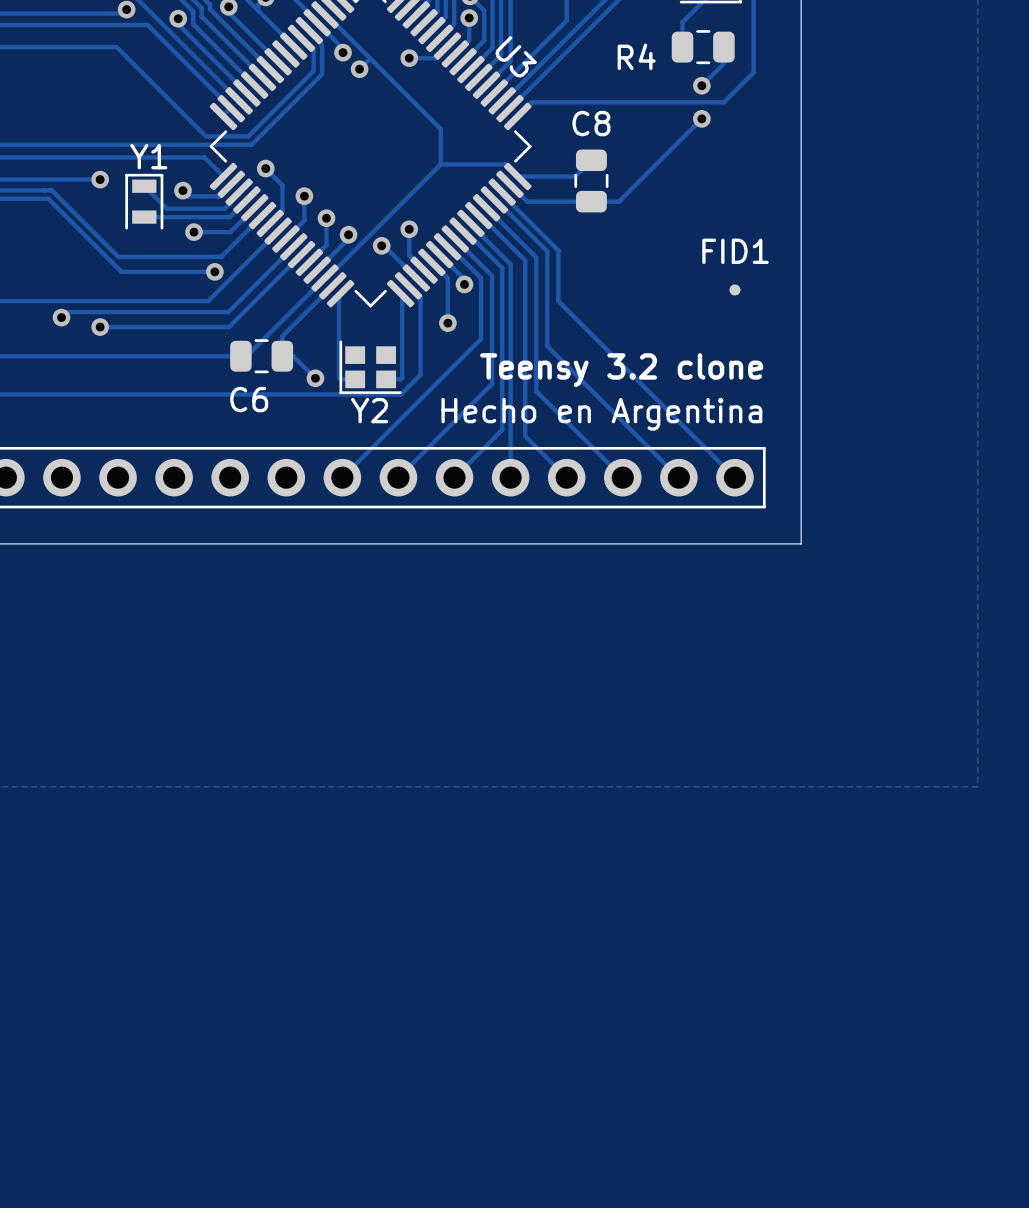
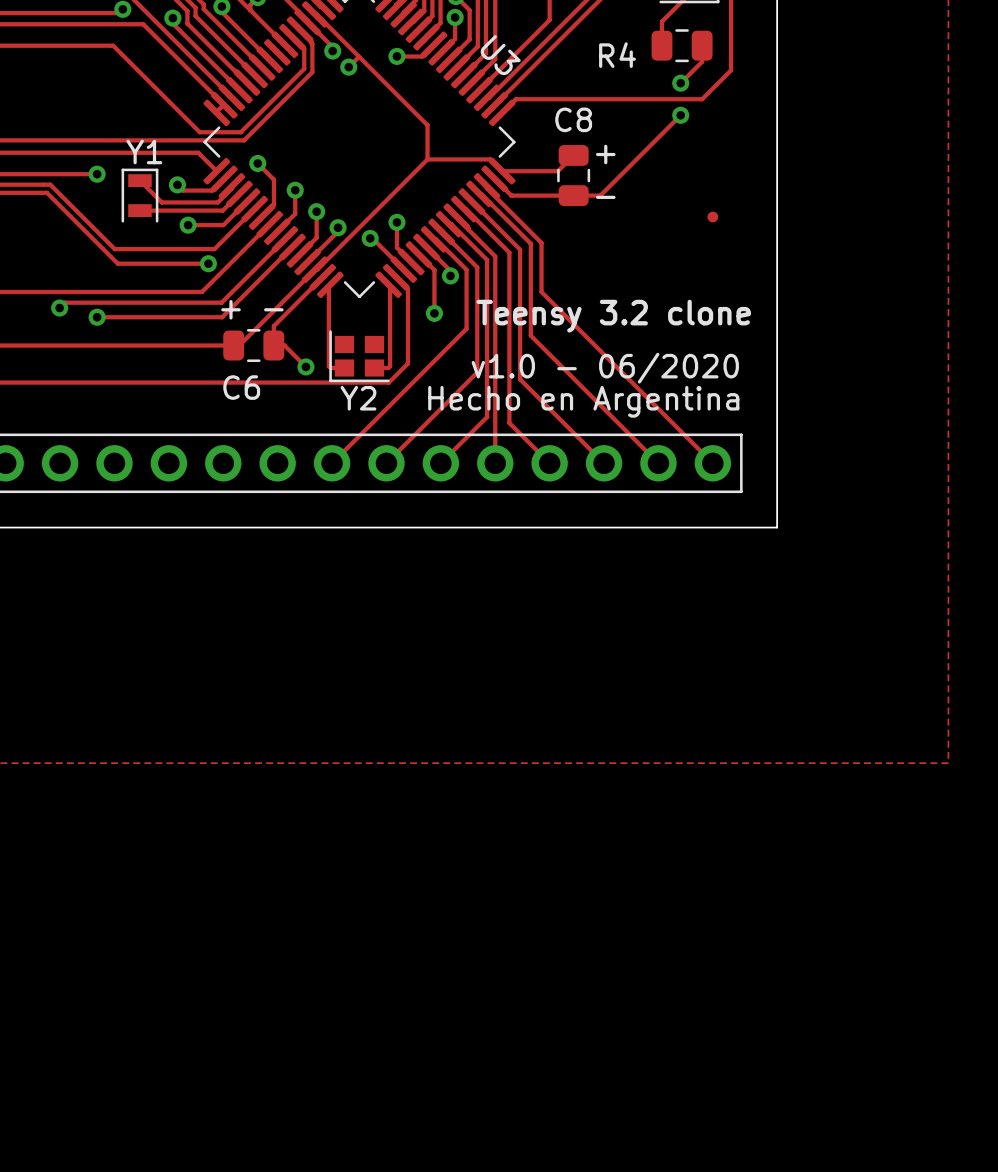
text: none -> + (605, 154)
text: none -> - (605, 197)
part: none -> (712, 217)
FID1: (734, 289) -> none
text: none -> + (230, 309)
text: none -> - (273, 309)
text position: Teensy 3.2 clone (621, 370) -> Teensy 3.2 clone (613, 316)
text: none -> v1.0 - 06/2020 (605, 368)

